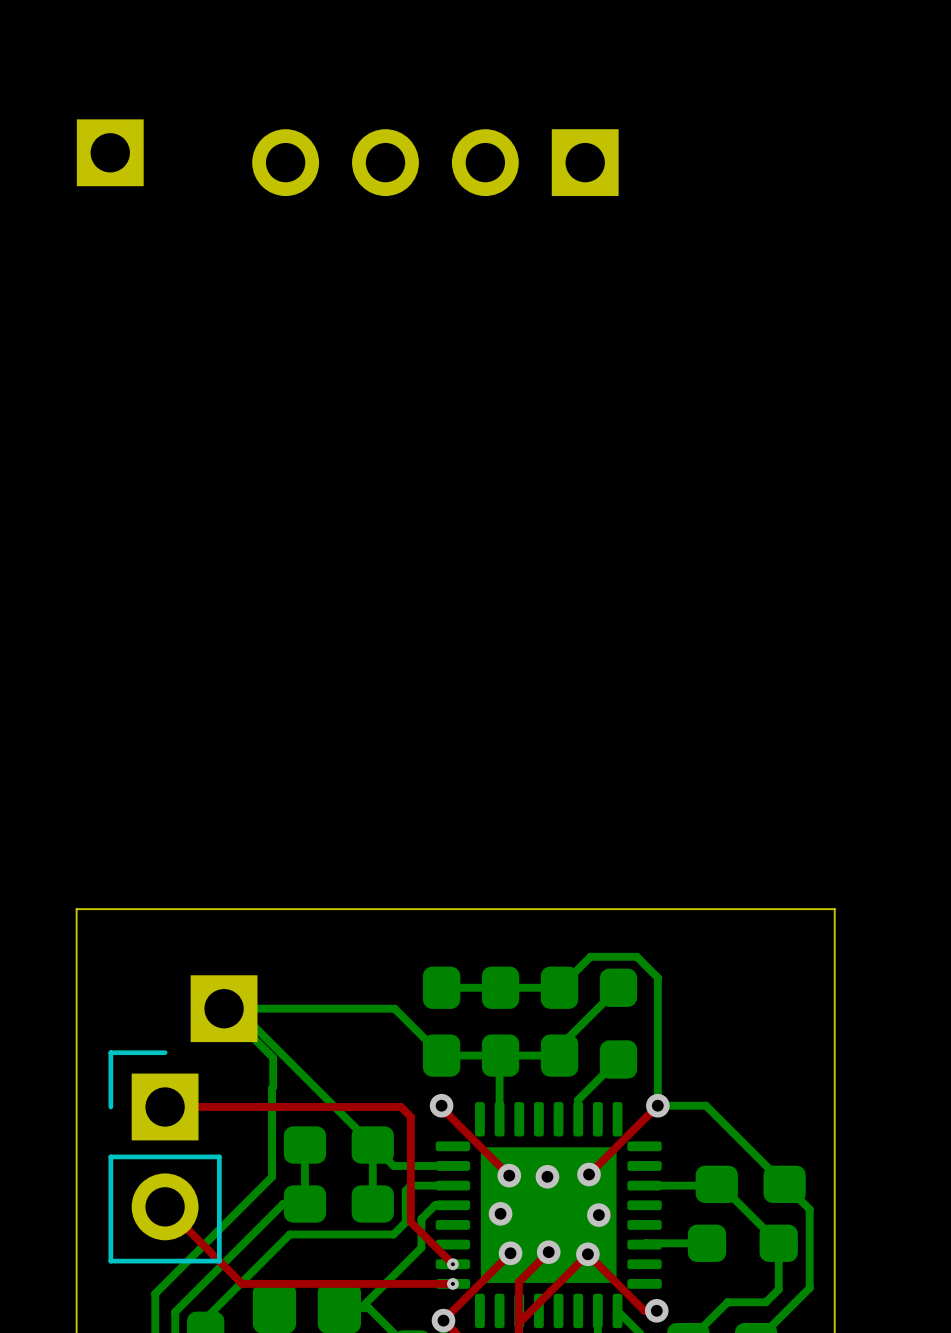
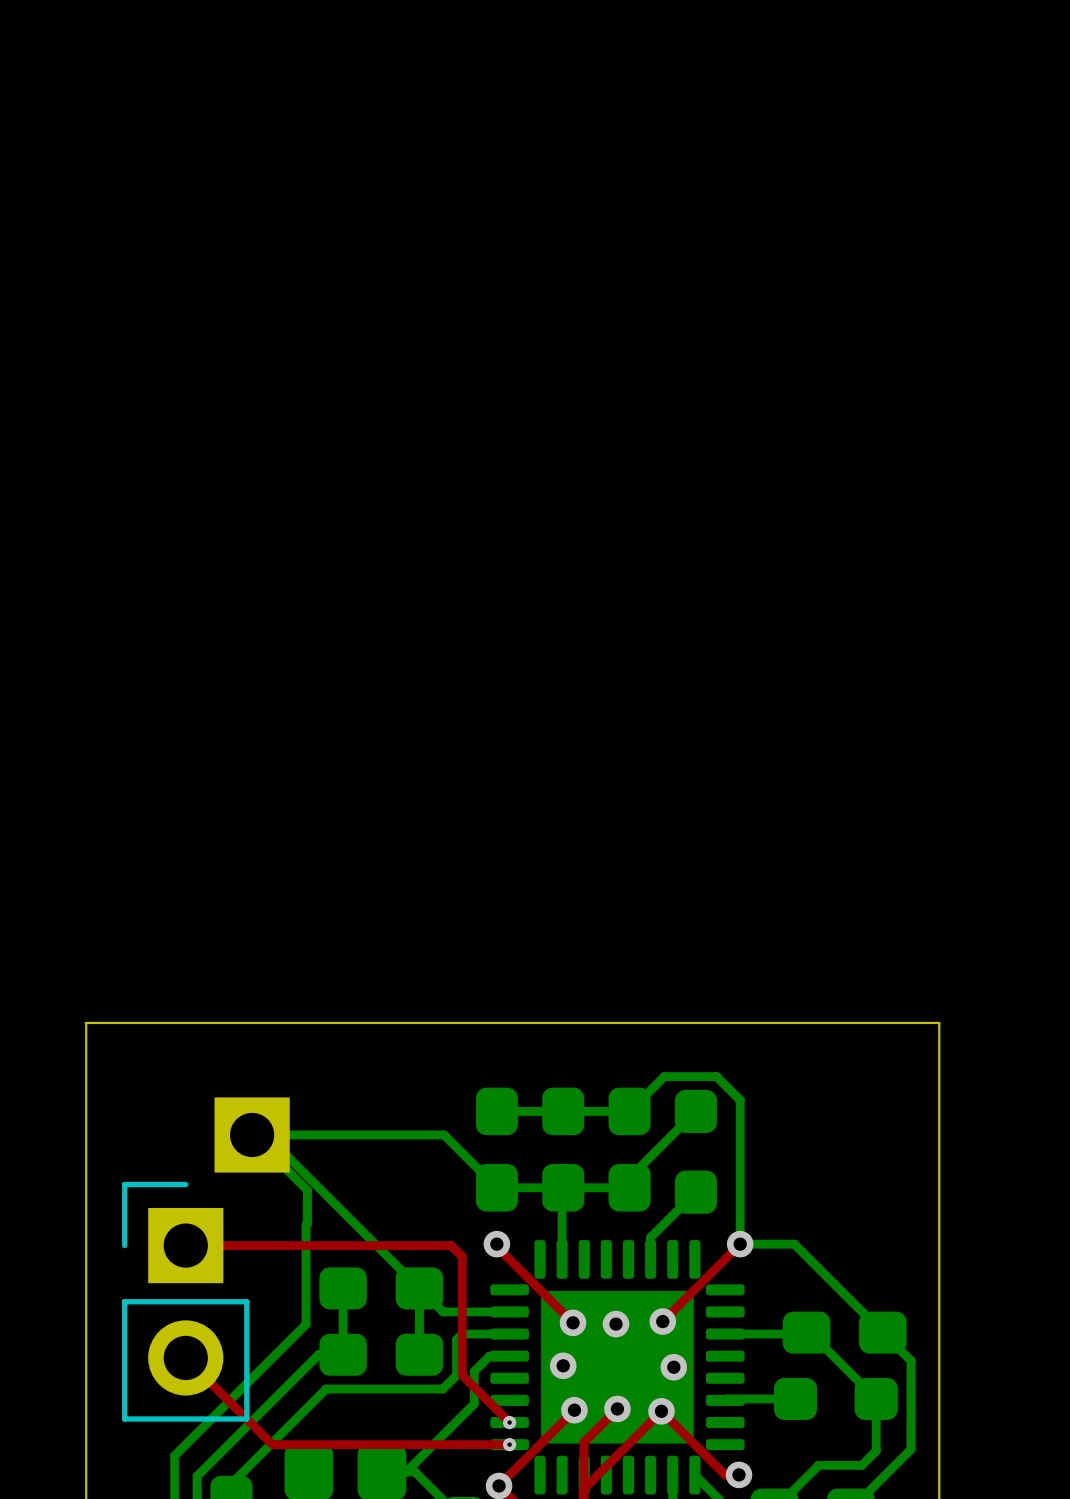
part: (110, 152) -> none
part: (435, 162) -> none

